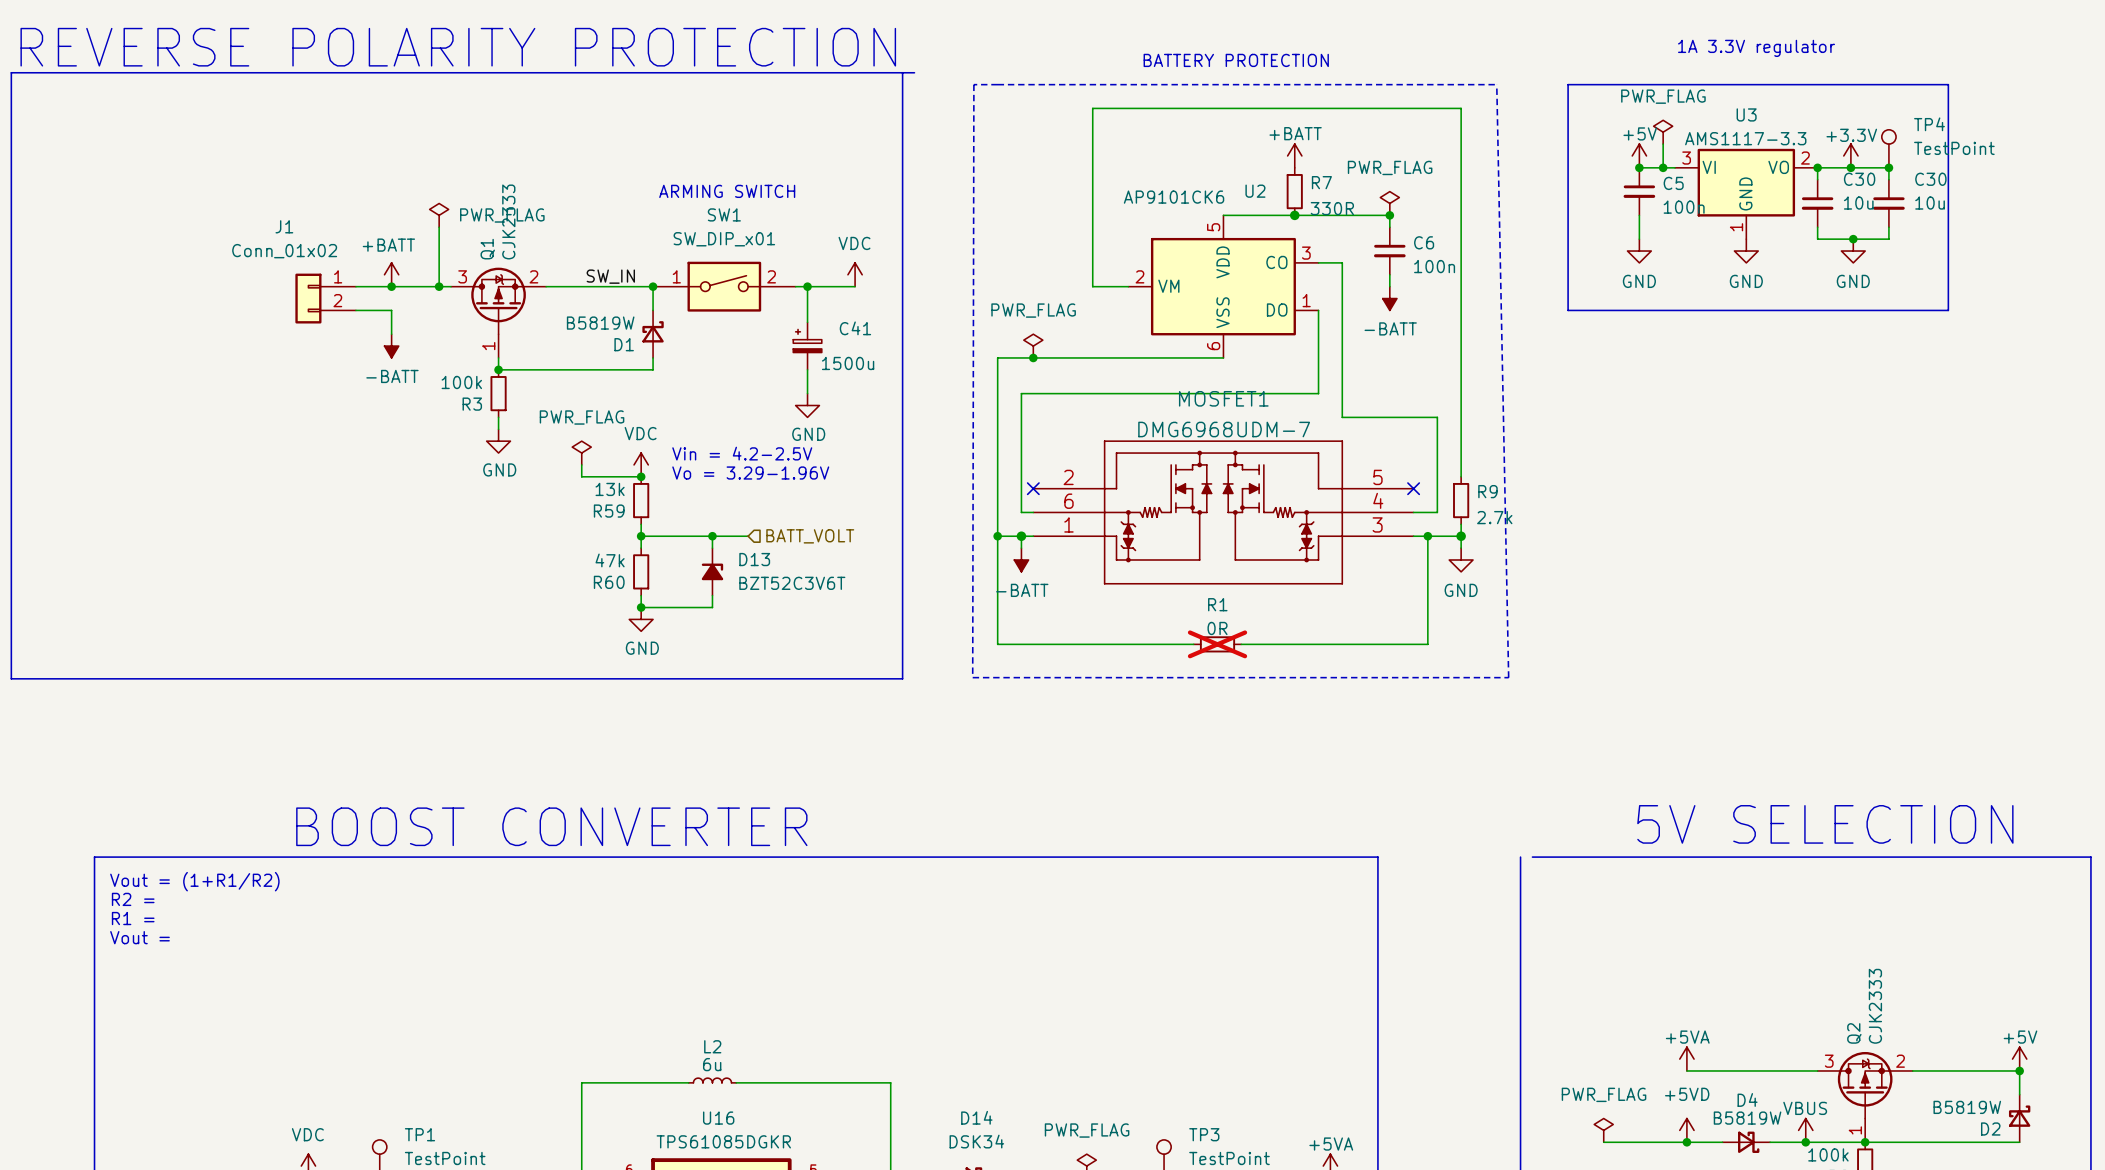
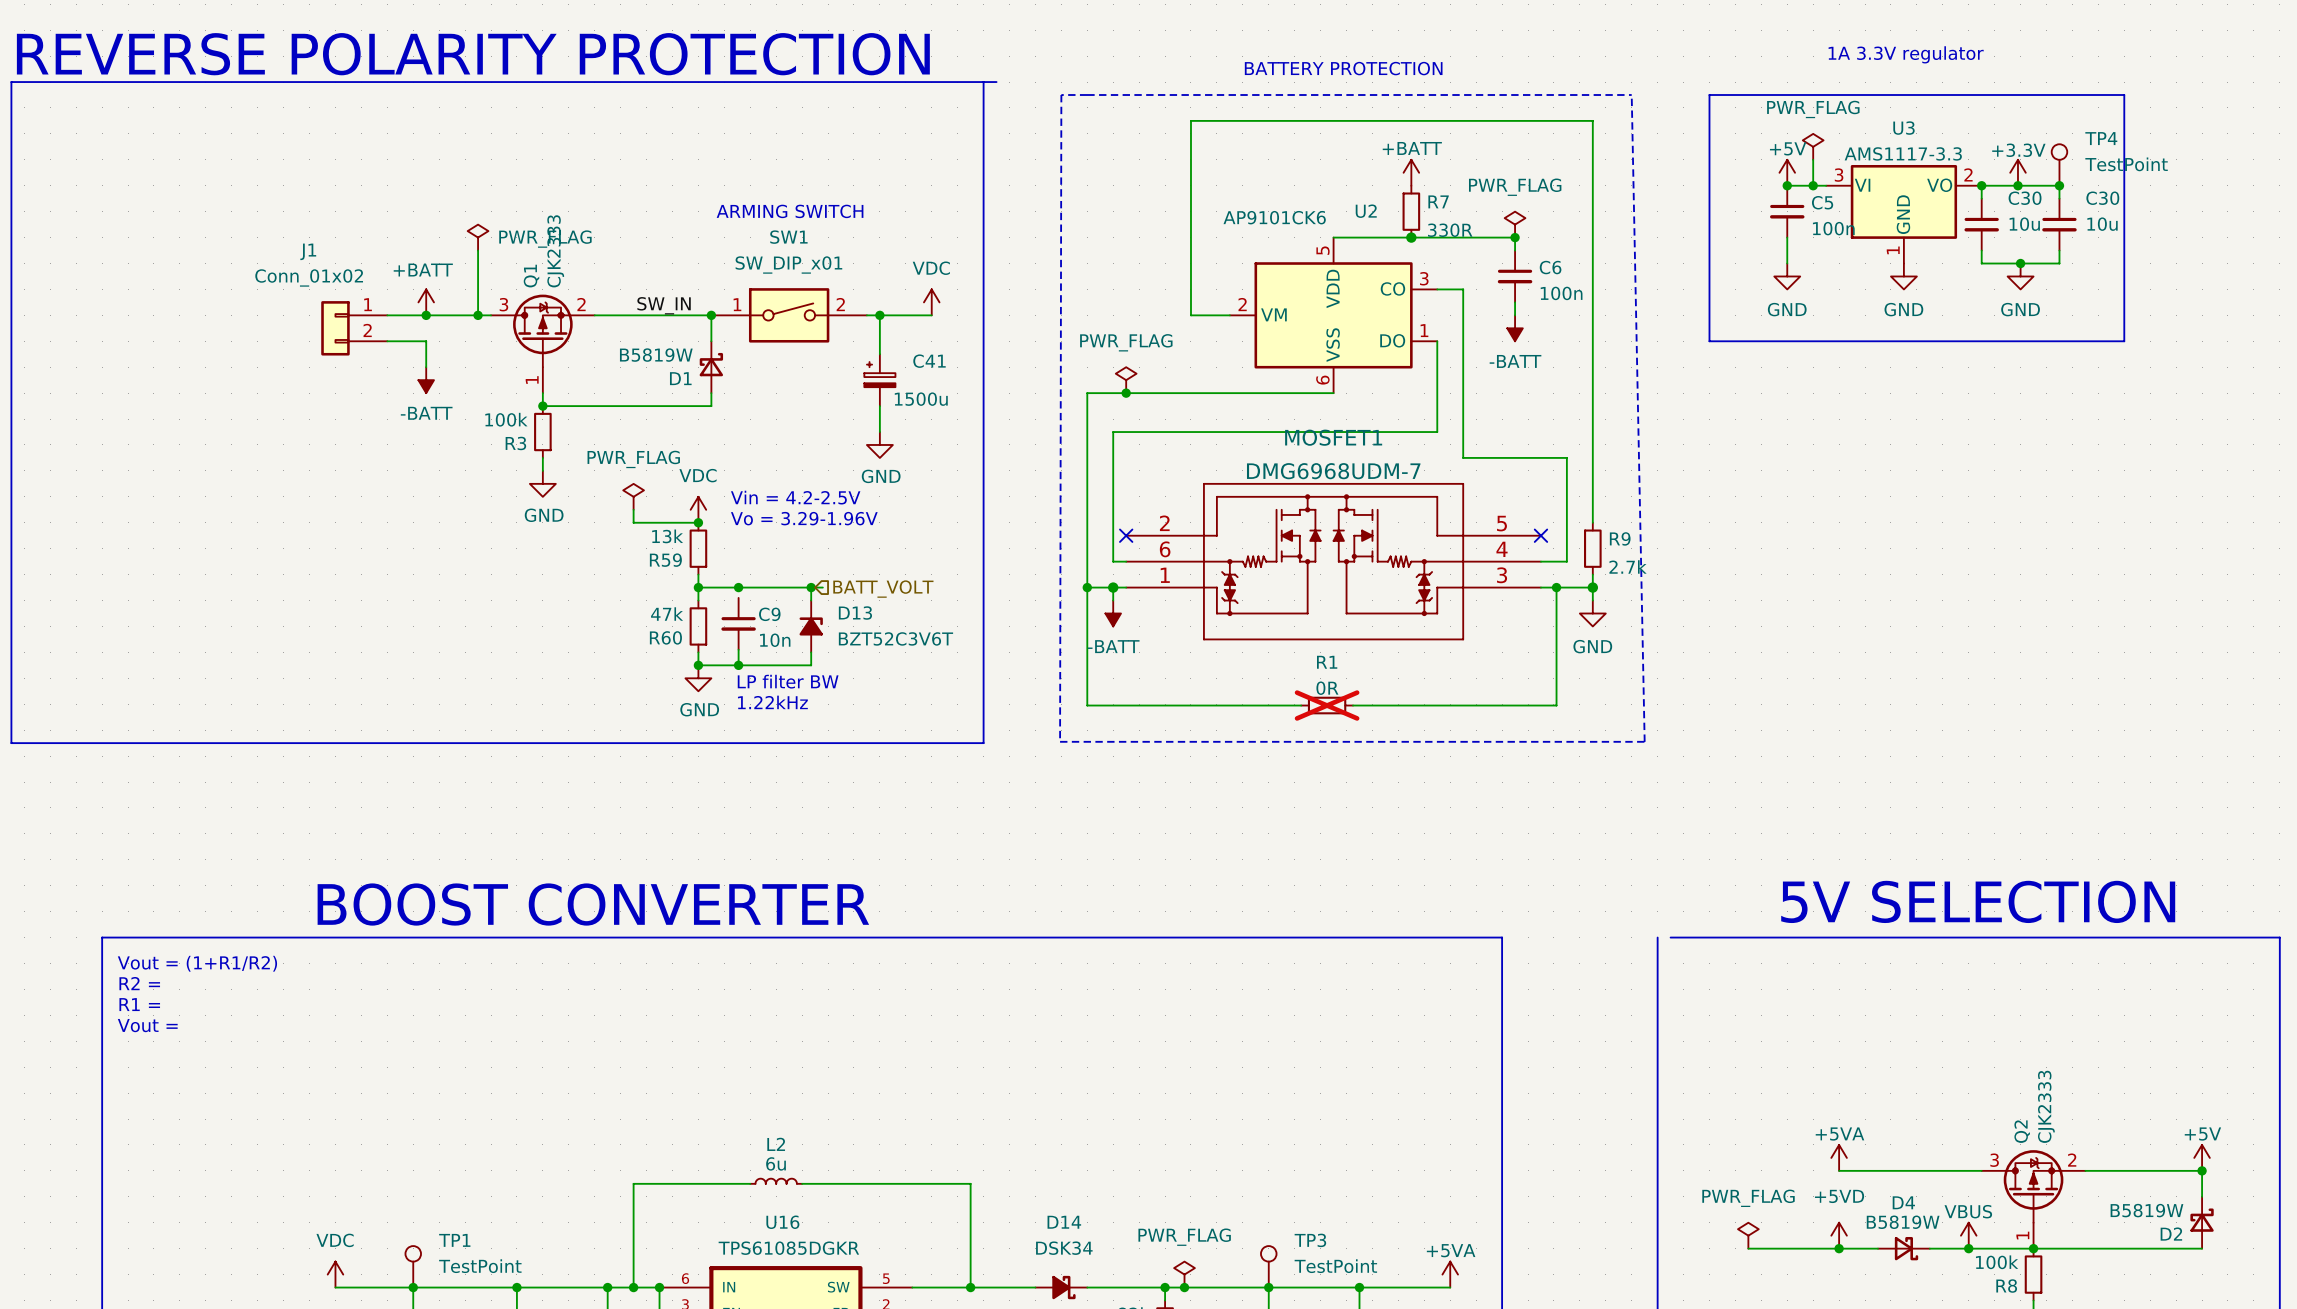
junction: none -> (738, 587)
wire: (712, 536) (712, 548) -> (811, 587) (811, 600)
junction: (712, 536) -> none
junction: none -> (811, 587)
wire: none -> (815, 587) (822, 587)
C9: none -> 10n (738, 623)
D13 position: (712, 571) -> (811, 626)
wire: none -> (738, 649) (738, 665)
wire: (712, 595) (712, 607) -> (811, 652) (811, 665) (776, 665)
junction: none -> (738, 665)
text: none -> LP filter BW (788, 681)
text: none -> 1.22kHz (772, 702)

